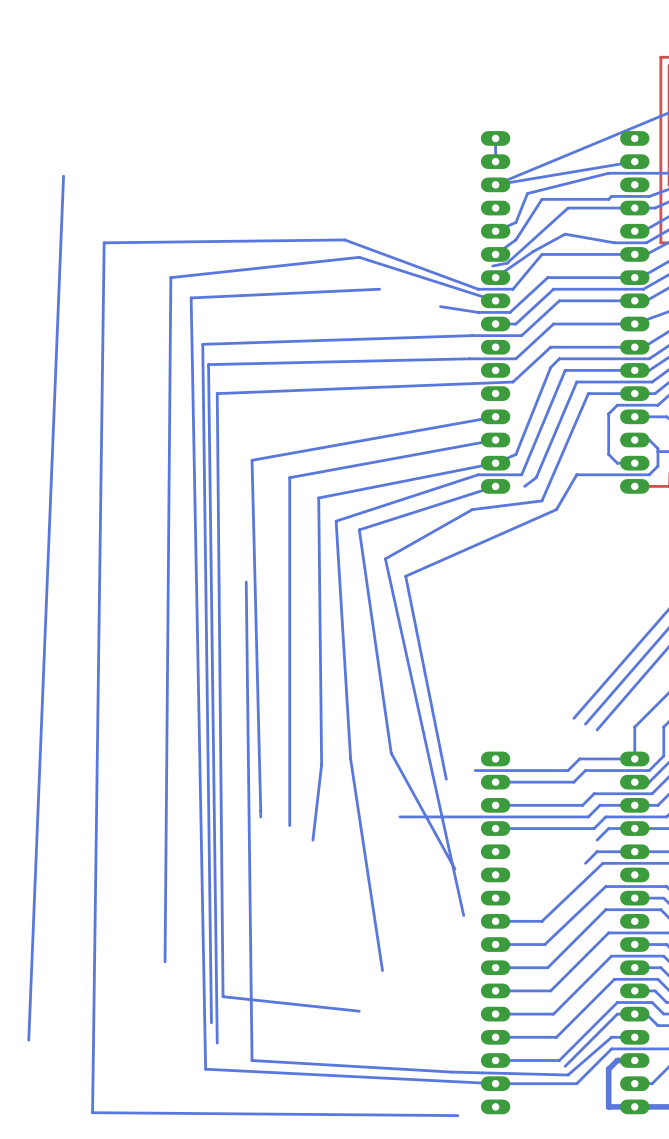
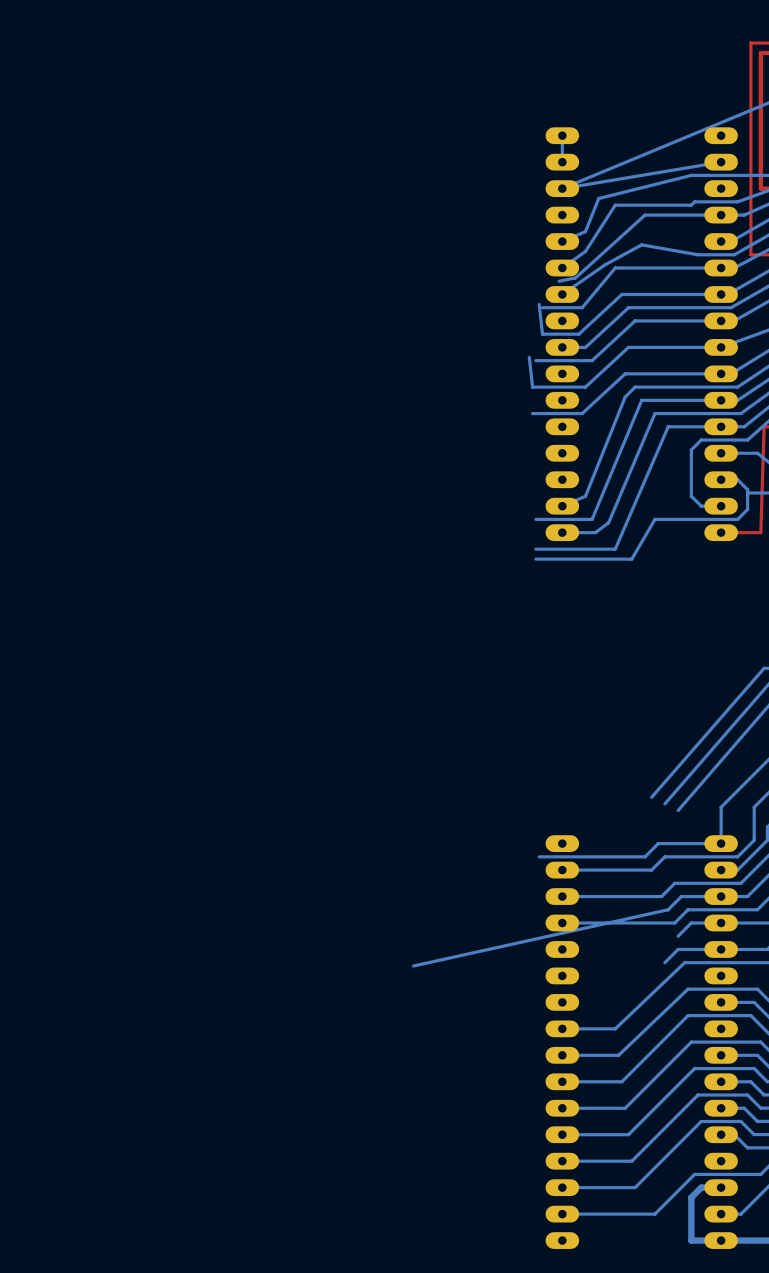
bottom track: (63, 176) (28, 1040) -> none
bottom track: (379, 289) (191, 297) (205, 1069) (495, 1083) -> none
bottom track: (478, 289) (344, 239) (104, 242) (92, 1112) (457, 1115) -> none
bottom track: (495, 300) (359, 257) (170, 277) (165, 961) -> none
bottom track: (440, 306) (478, 312) -> (539, 304) (542, 334)
bottom track: (472, 335) (202, 344) (211, 1022) -> none
bottom track: (469, 358) (208, 364) (217, 1043) -> (532, 387) (529, 357)
bottom track: (512, 382) (217, 393) (223, 996) (359, 1011) -> (582, 413) (532, 413)
bottom track: (495, 416) (252, 460) (260, 816) -> none
bottom track: (495, 440) (289, 477) (289, 825) -> none
bottom track: (495, 463) (318, 498) (321, 764) (312, 840) -> none
bottom track: (478, 474) (336, 521) (350, 758) (382, 970) -> (542, 519) (535, 519)
bottom track: (495, 486) (359, 529) (391, 753) (455, 869) -> (562, 532) (595, 532)
bottom track: (541, 500) (472, 509) (385, 558) (463, 915) -> (615, 549) (535, 549)
bottom track: (556, 509) (405, 576) (446, 779) -> (631, 559) (535, 559)
bottom track: (246, 582) (252, 1060) (452, 1072) (568, 1075) (611, 1037) (634, 1037) -> none
bottom track: (588, 816) (399, 816) -> (668, 909) (413, 966)
bottom track: (634, 1014) (617, 1014) (565, 1066) -> none

